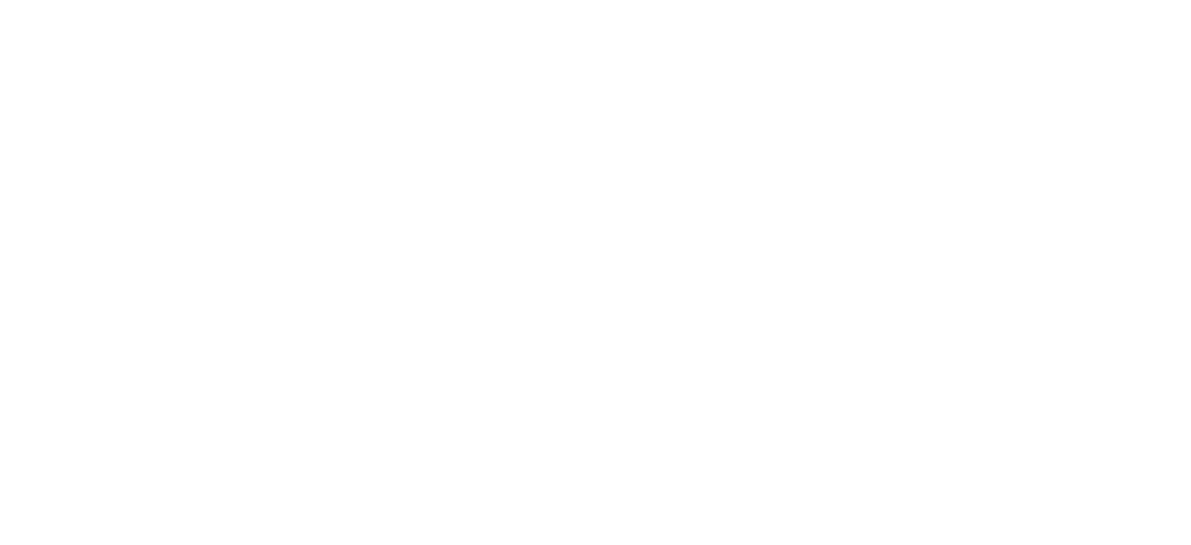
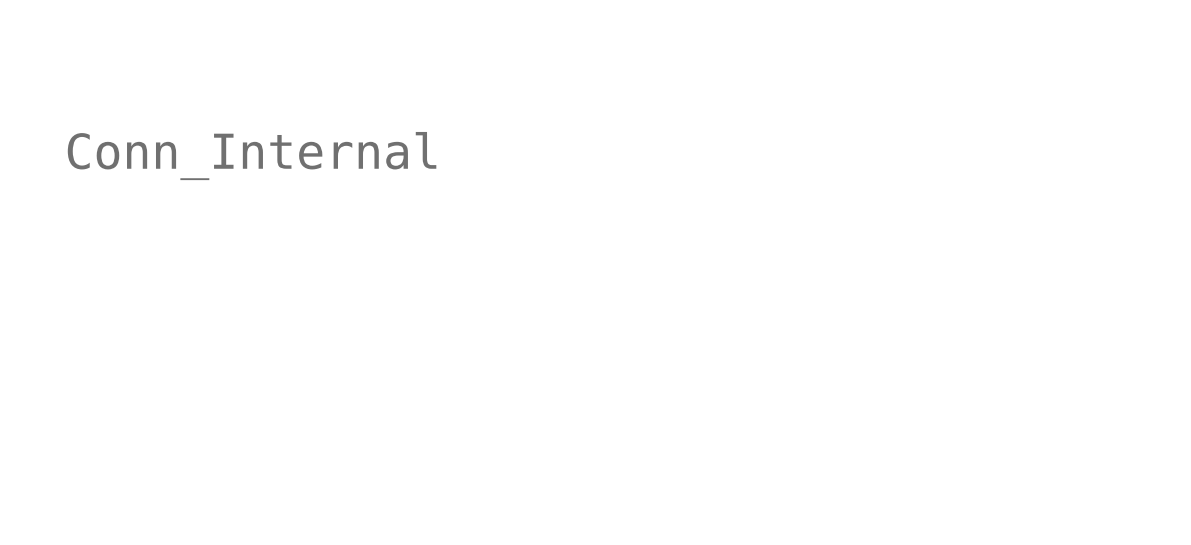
text: none -> Conn_Internal (252, 156)

